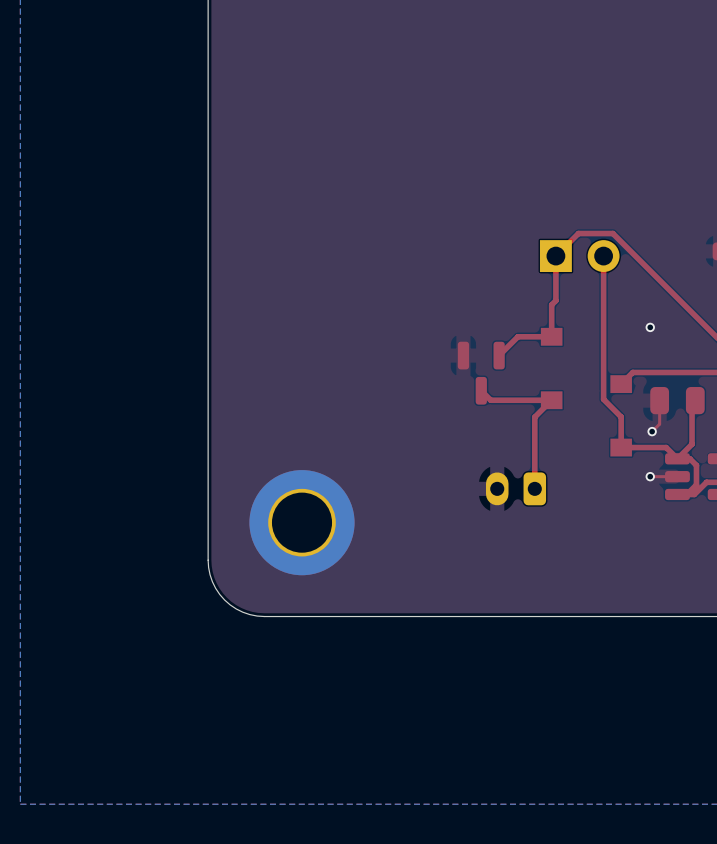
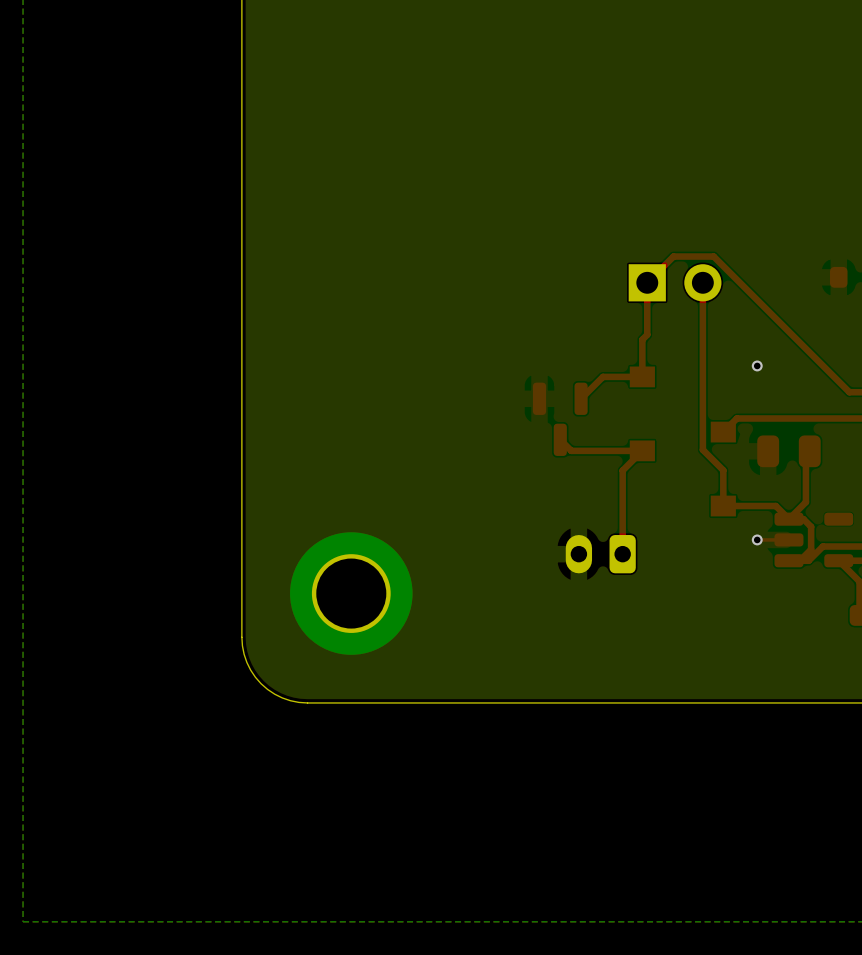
top track: (659, 400) (659, 424) (652, 431) -> none
via: (652, 431) -> none

